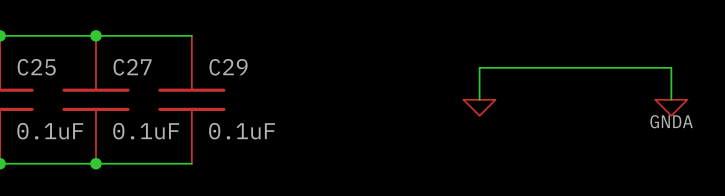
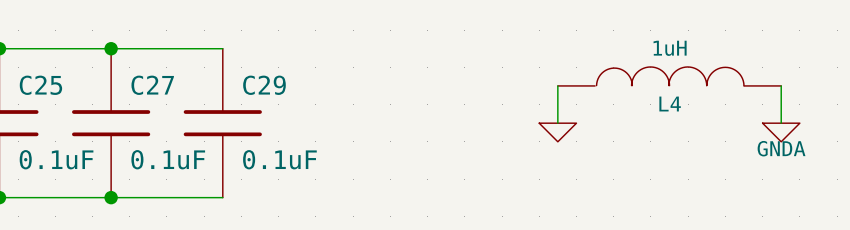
L4: none -> 1uH (669, 76)
wire: (479, 67) (671, 67) -> none

